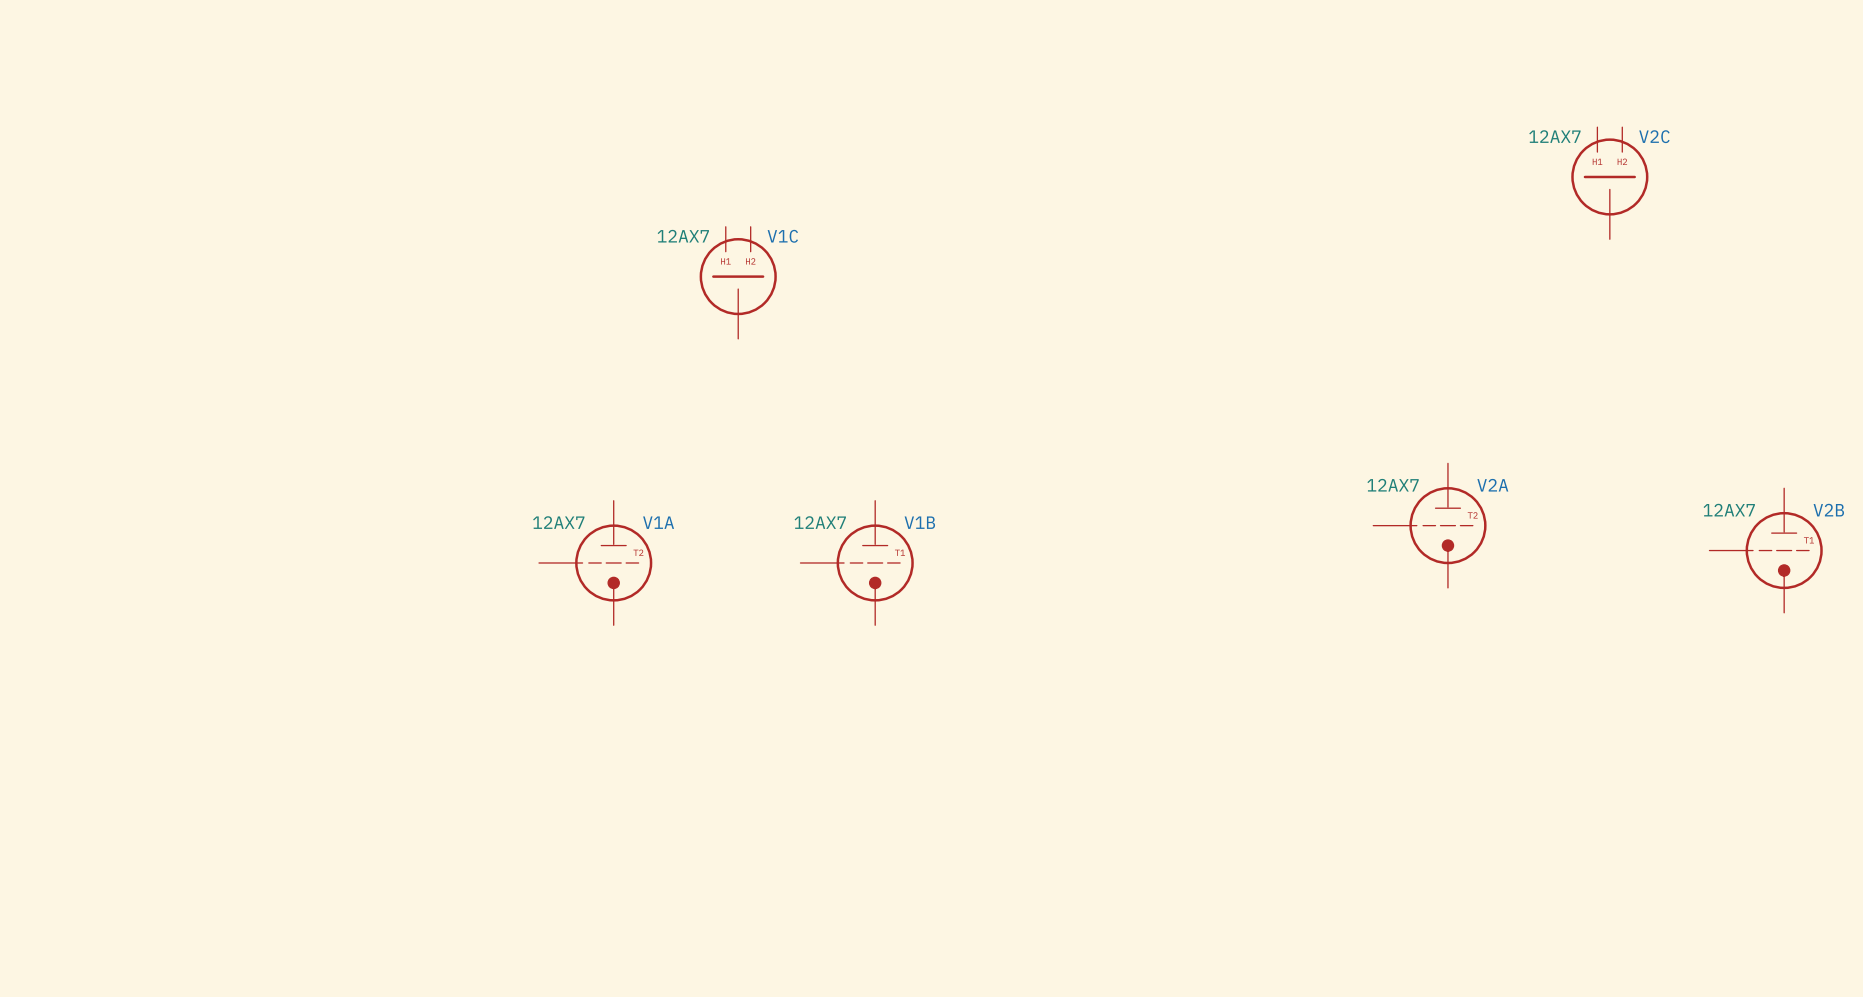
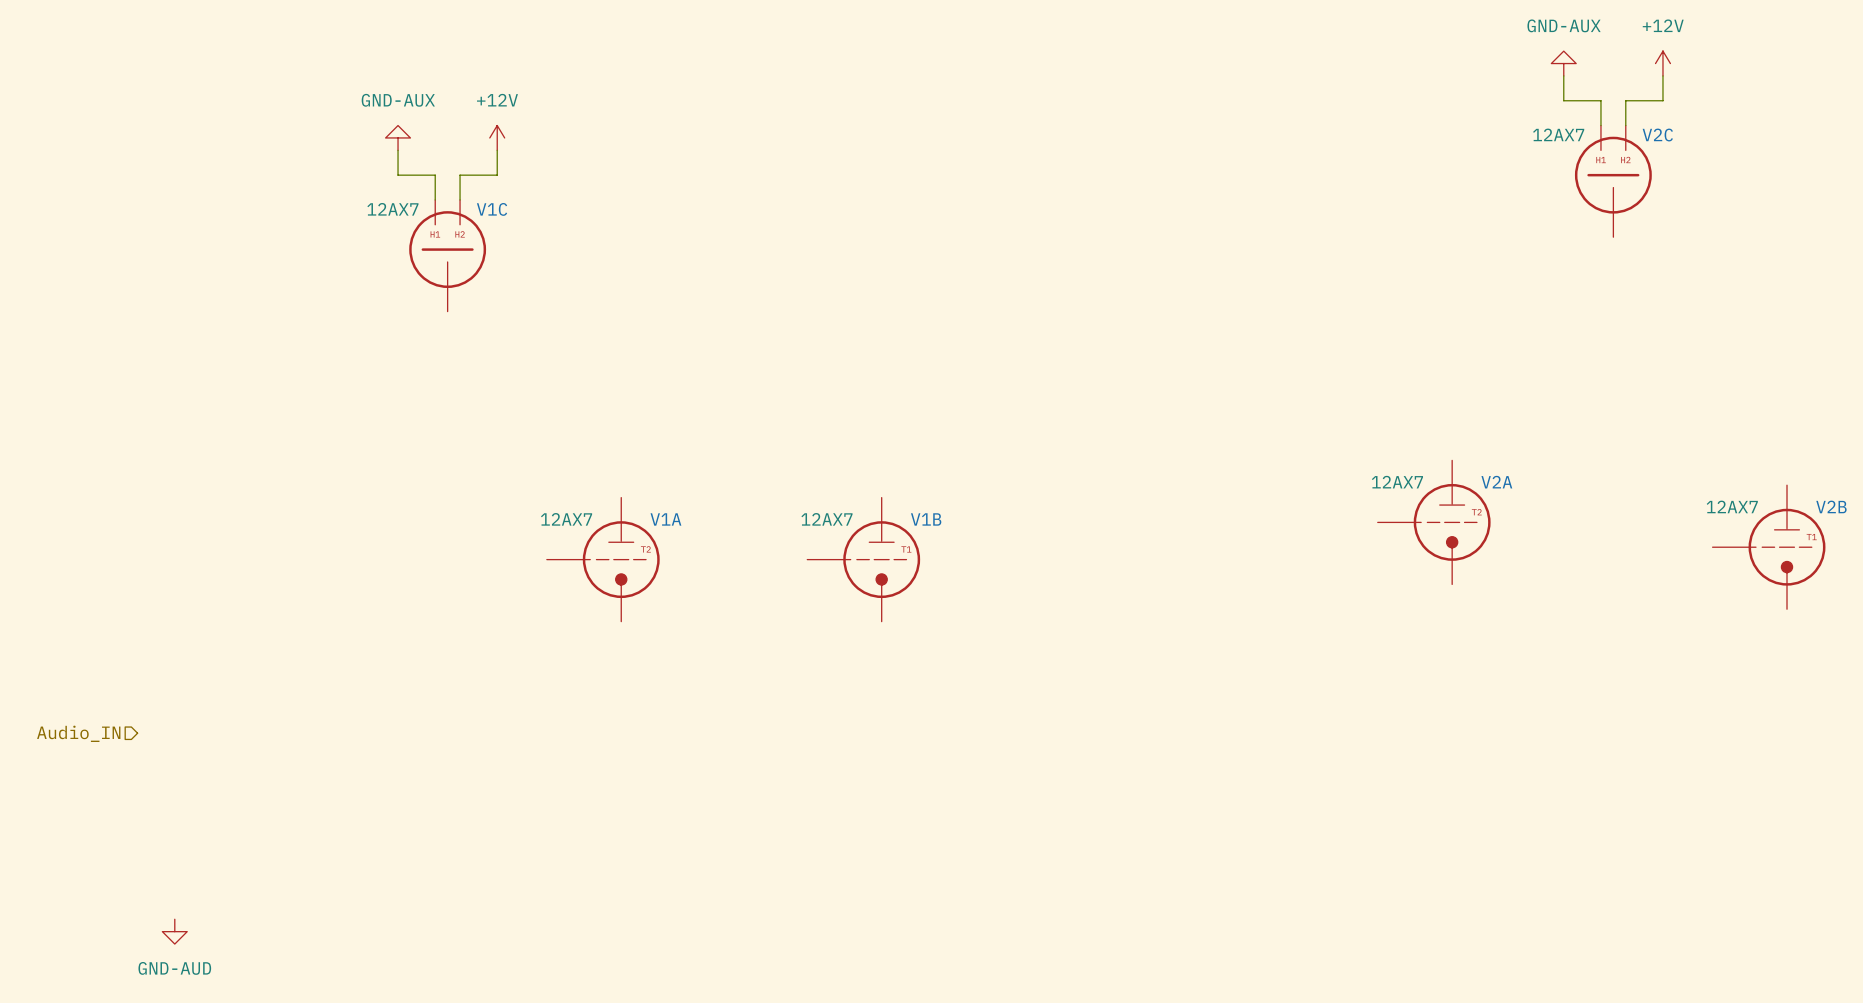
power symbol: none -> GND-AUX (1563, 63)
power symbol: none -> +12V (1662, 63)
wire: none -> (1563, 75) (1563, 100) (1600, 100) (1600, 125)
wire: none -> (1662, 75) (1662, 100) (1625, 100) (1625, 125)
power symbol: none -> GND-AUX (398, 137)
power symbol: none -> +12V (497, 137)
wire: none -> (398, 150) (398, 175) (435, 175) (435, 199)
wire: none -> (497, 150) (497, 175) (460, 175) (460, 199)
V1C position: (738, 282) -> (447, 255)
hierarchical label: none -> Audio_IN (78, 733)
power symbol: none -> GND-AUD (174, 931)

